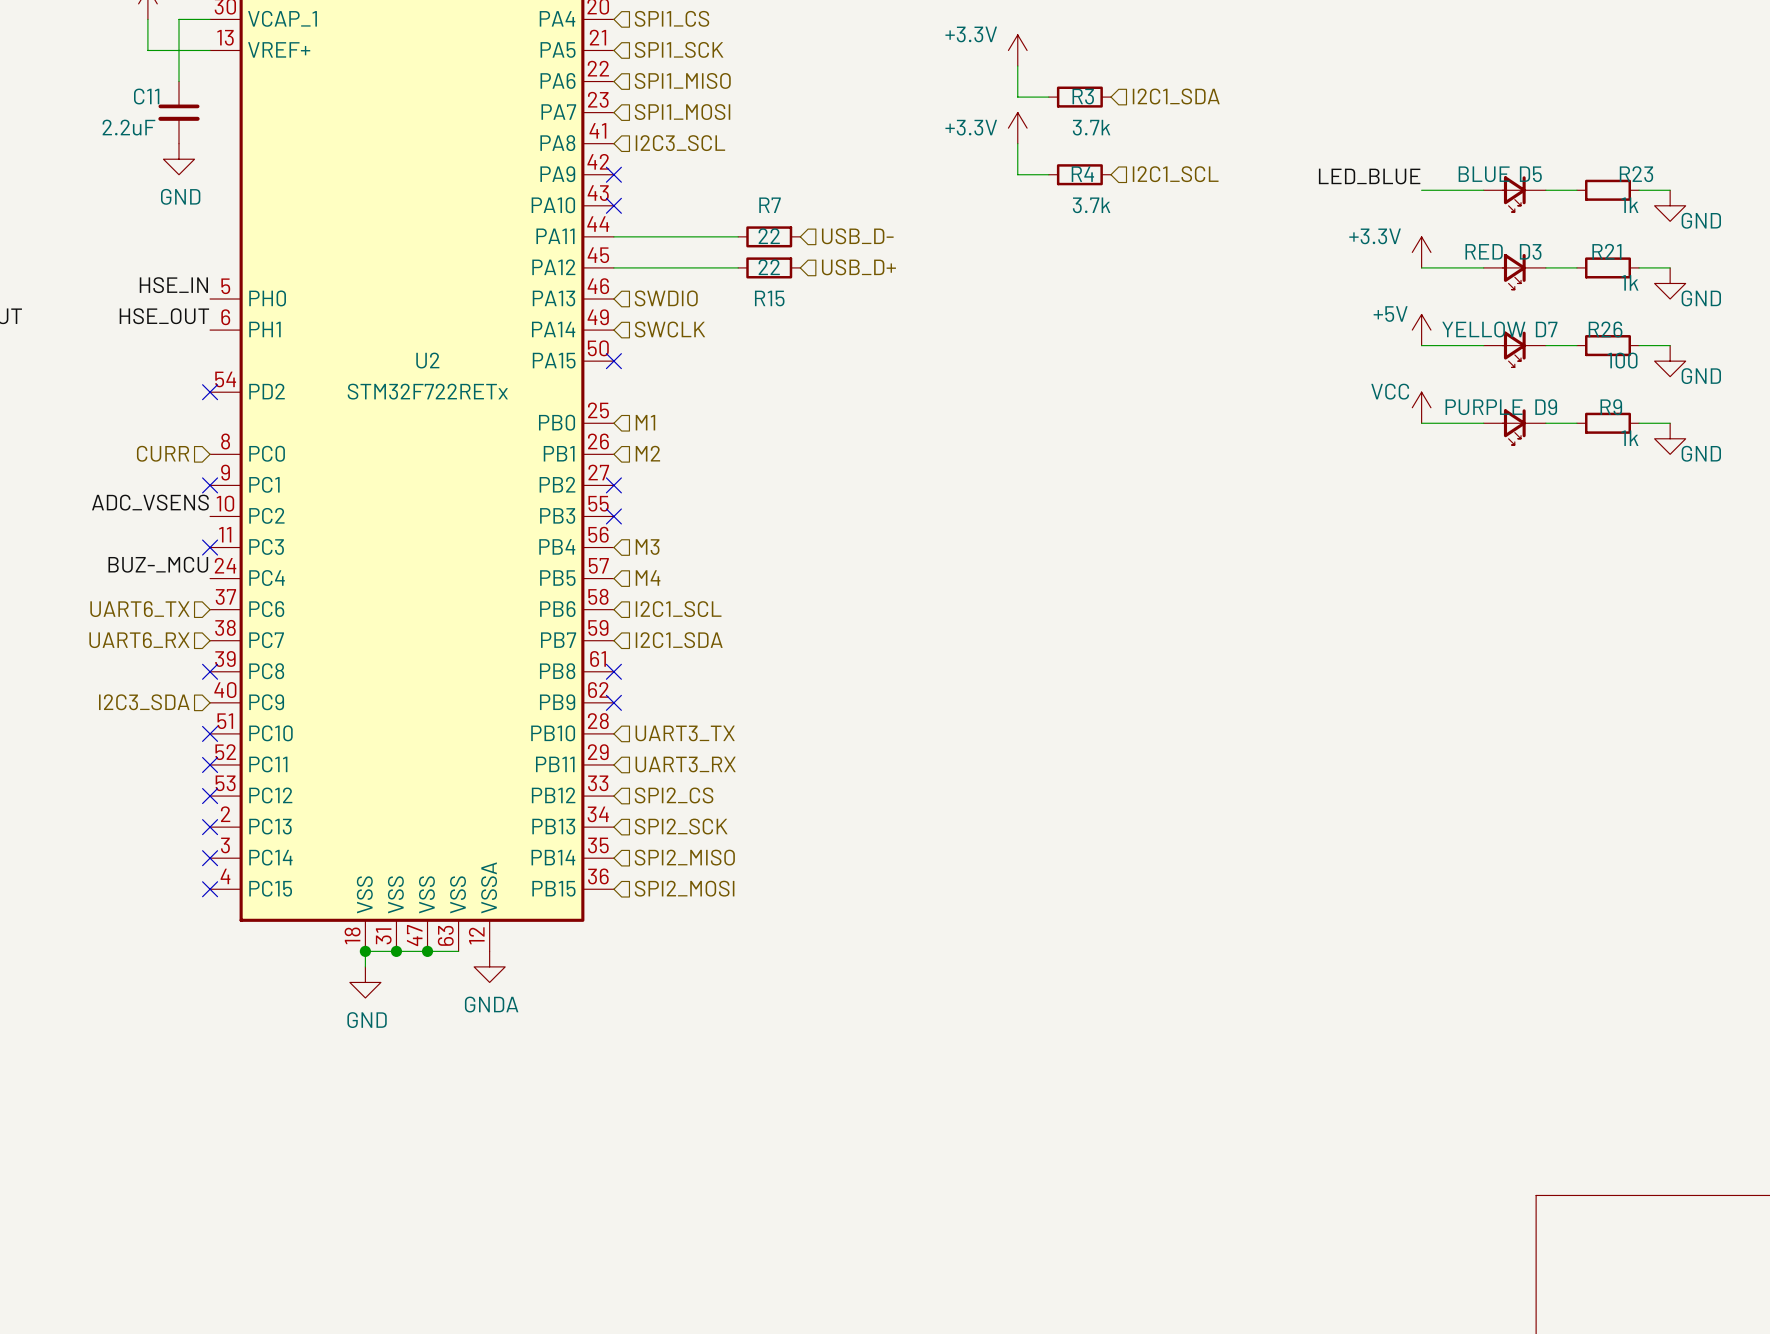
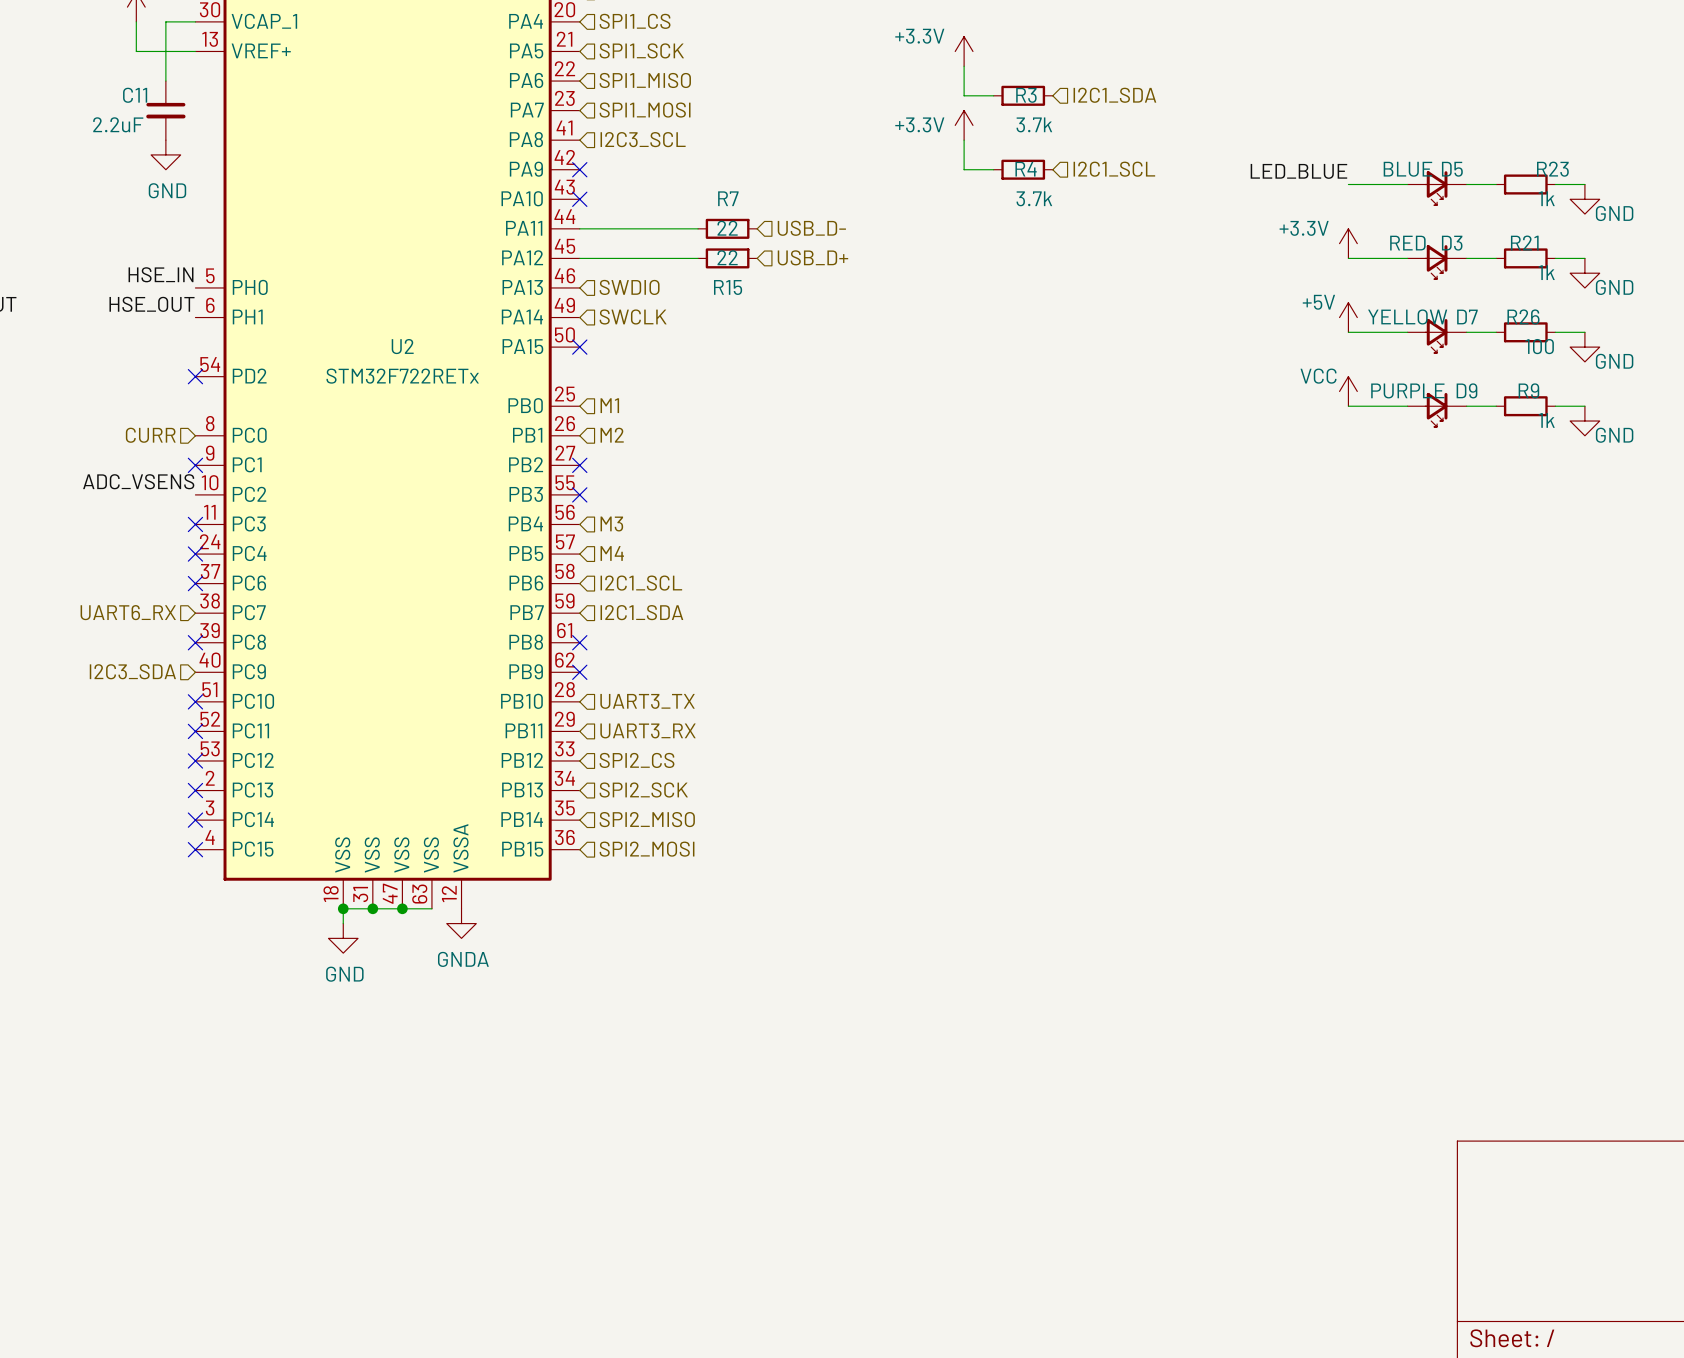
label: BUZ-_MCU (158, 564) -> none
no-connect mark: none -> (195, 554)
hierarchical label: UART6_TX (139, 609) -> none
no-connect mark: none -> (195, 583)

